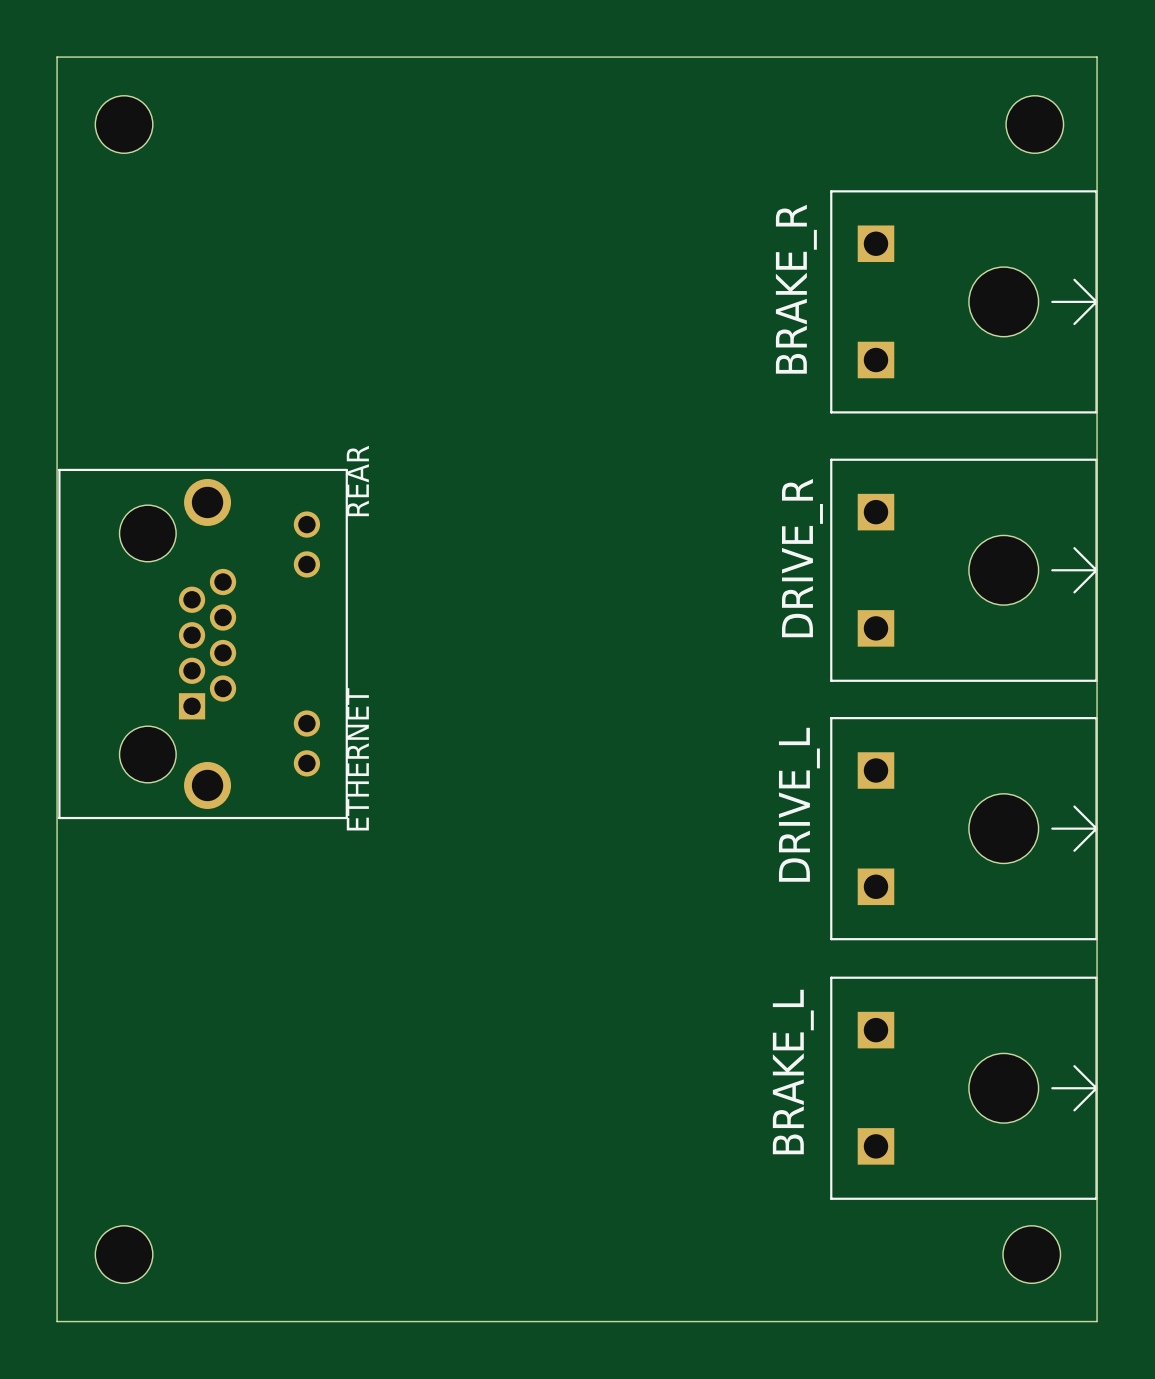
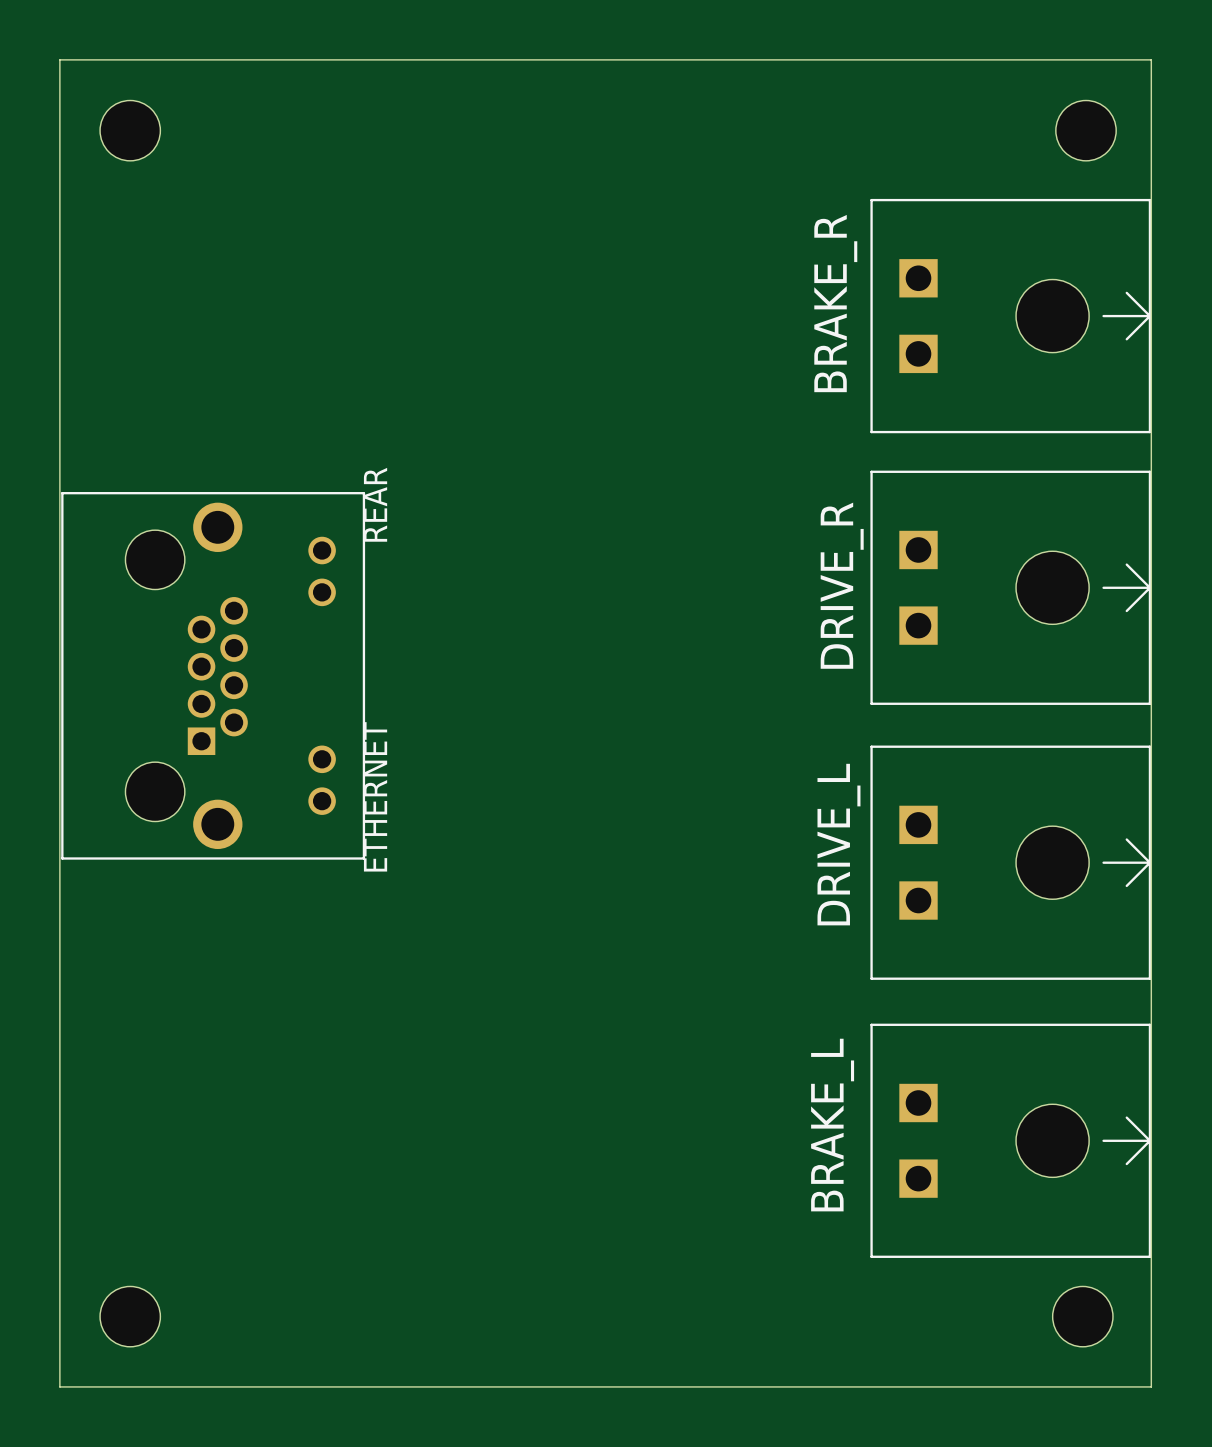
part footprint: [830, 190, 1098, 414] -> [870, 198, 1152, 434]
part footprint: [830, 458, 1098, 682] -> [870, 470, 1152, 705]
part footprint: [830, 717, 1098, 941] -> [870, 745, 1152, 980]
part footprint: [830, 976, 1098, 1200] -> [870, 1023, 1152, 1258]

